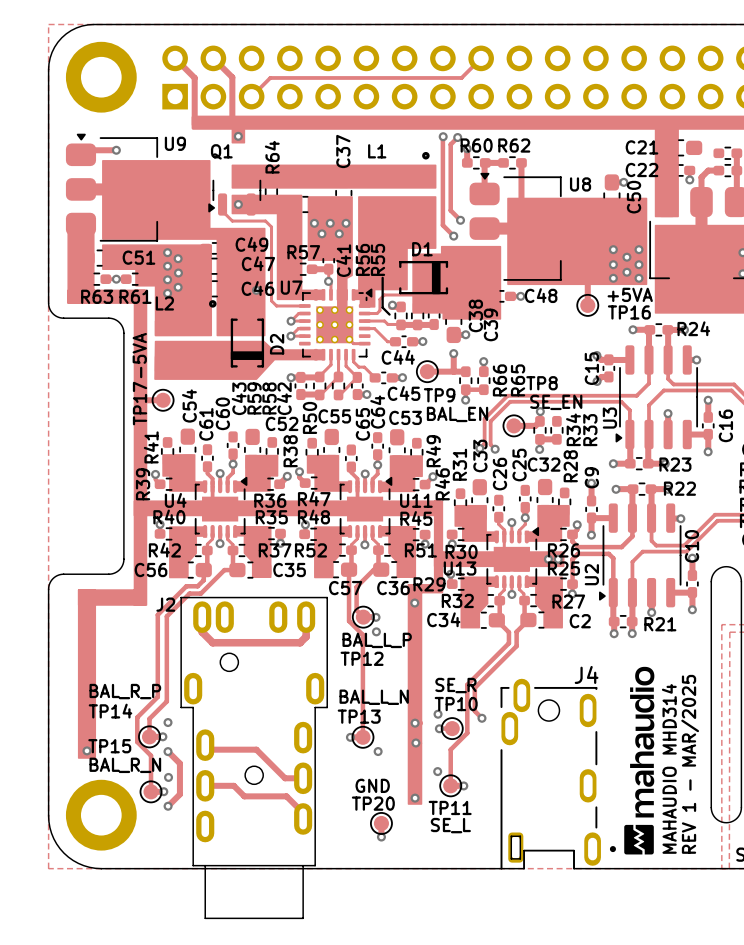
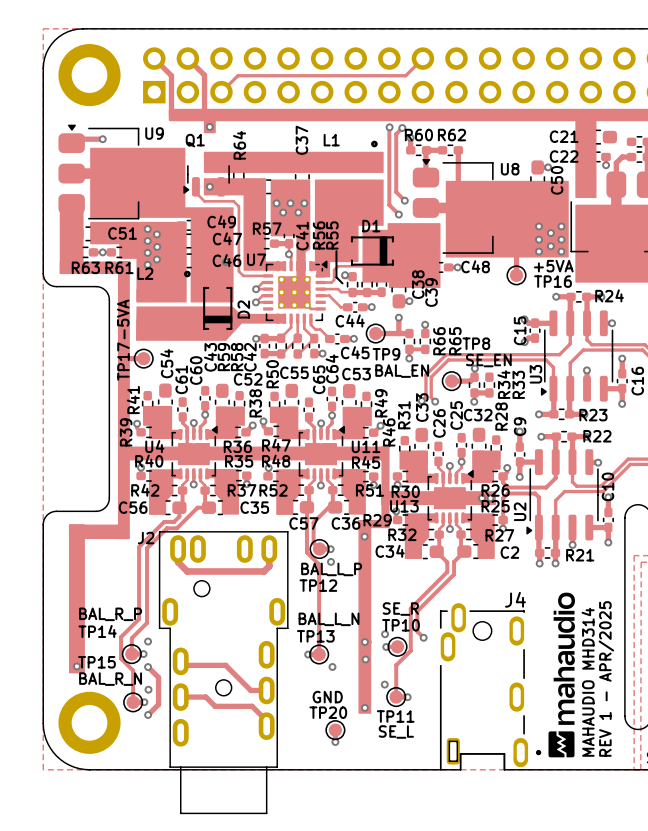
text: REV 1 - MAR/2025 (690, 764) -> REV 1 - APR/2025 (606, 678)

